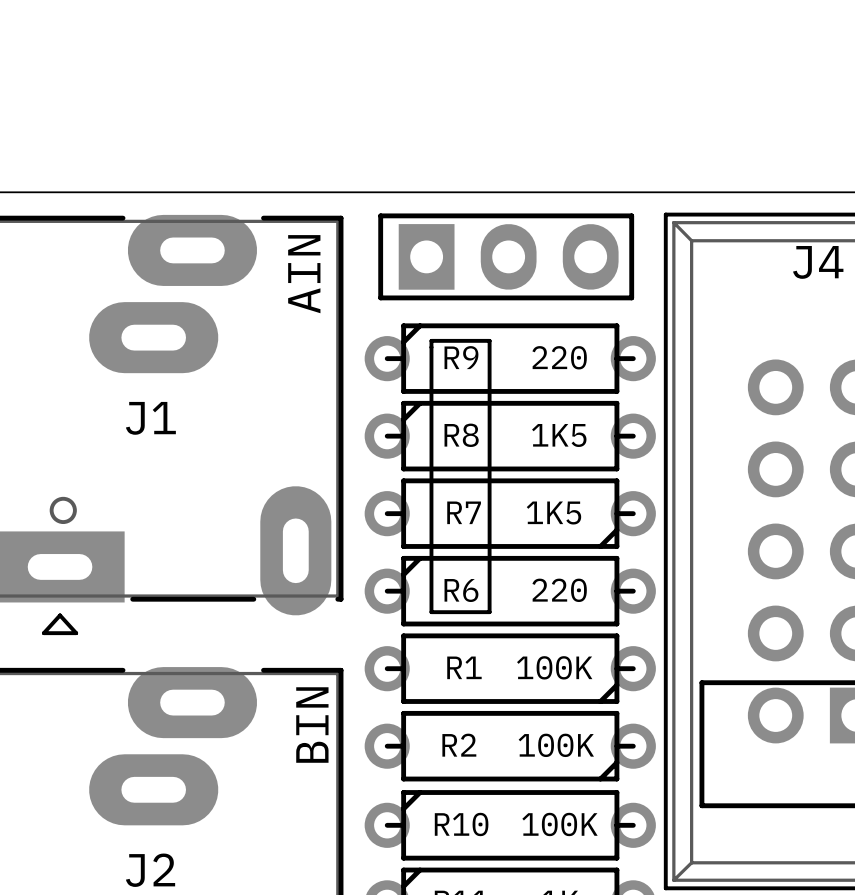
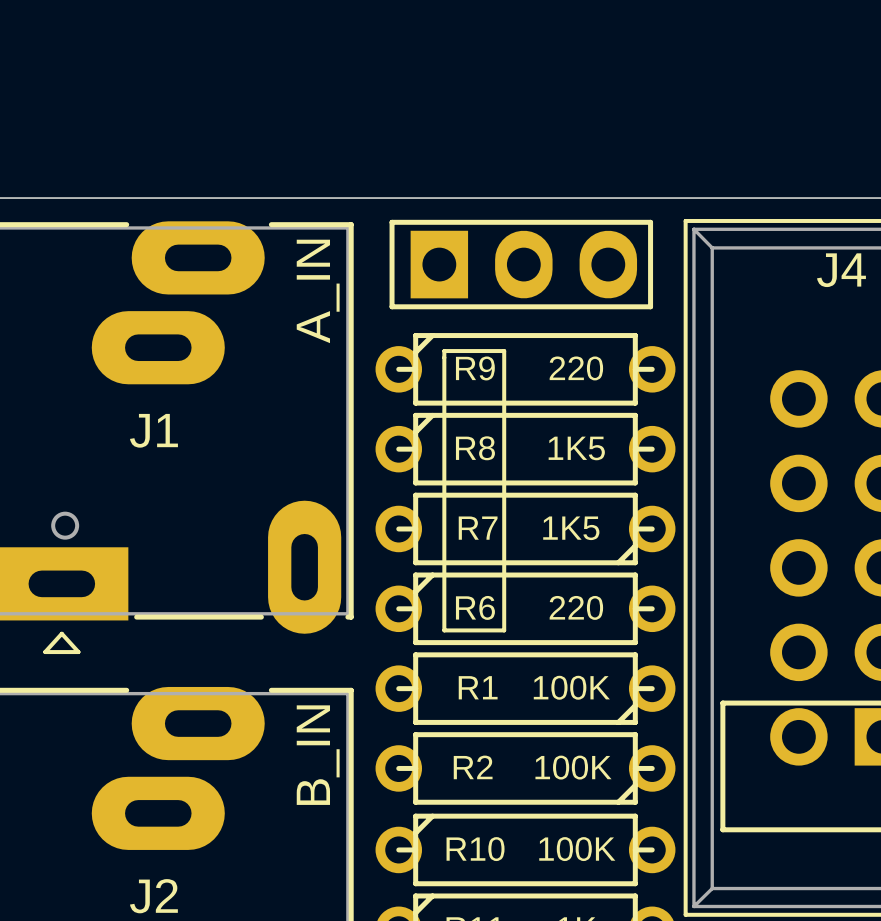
J1 value: AIN (304, 274) -> A_IN (318, 291)
J2 value: BIN (312, 725) -> B_IN (318, 755)

